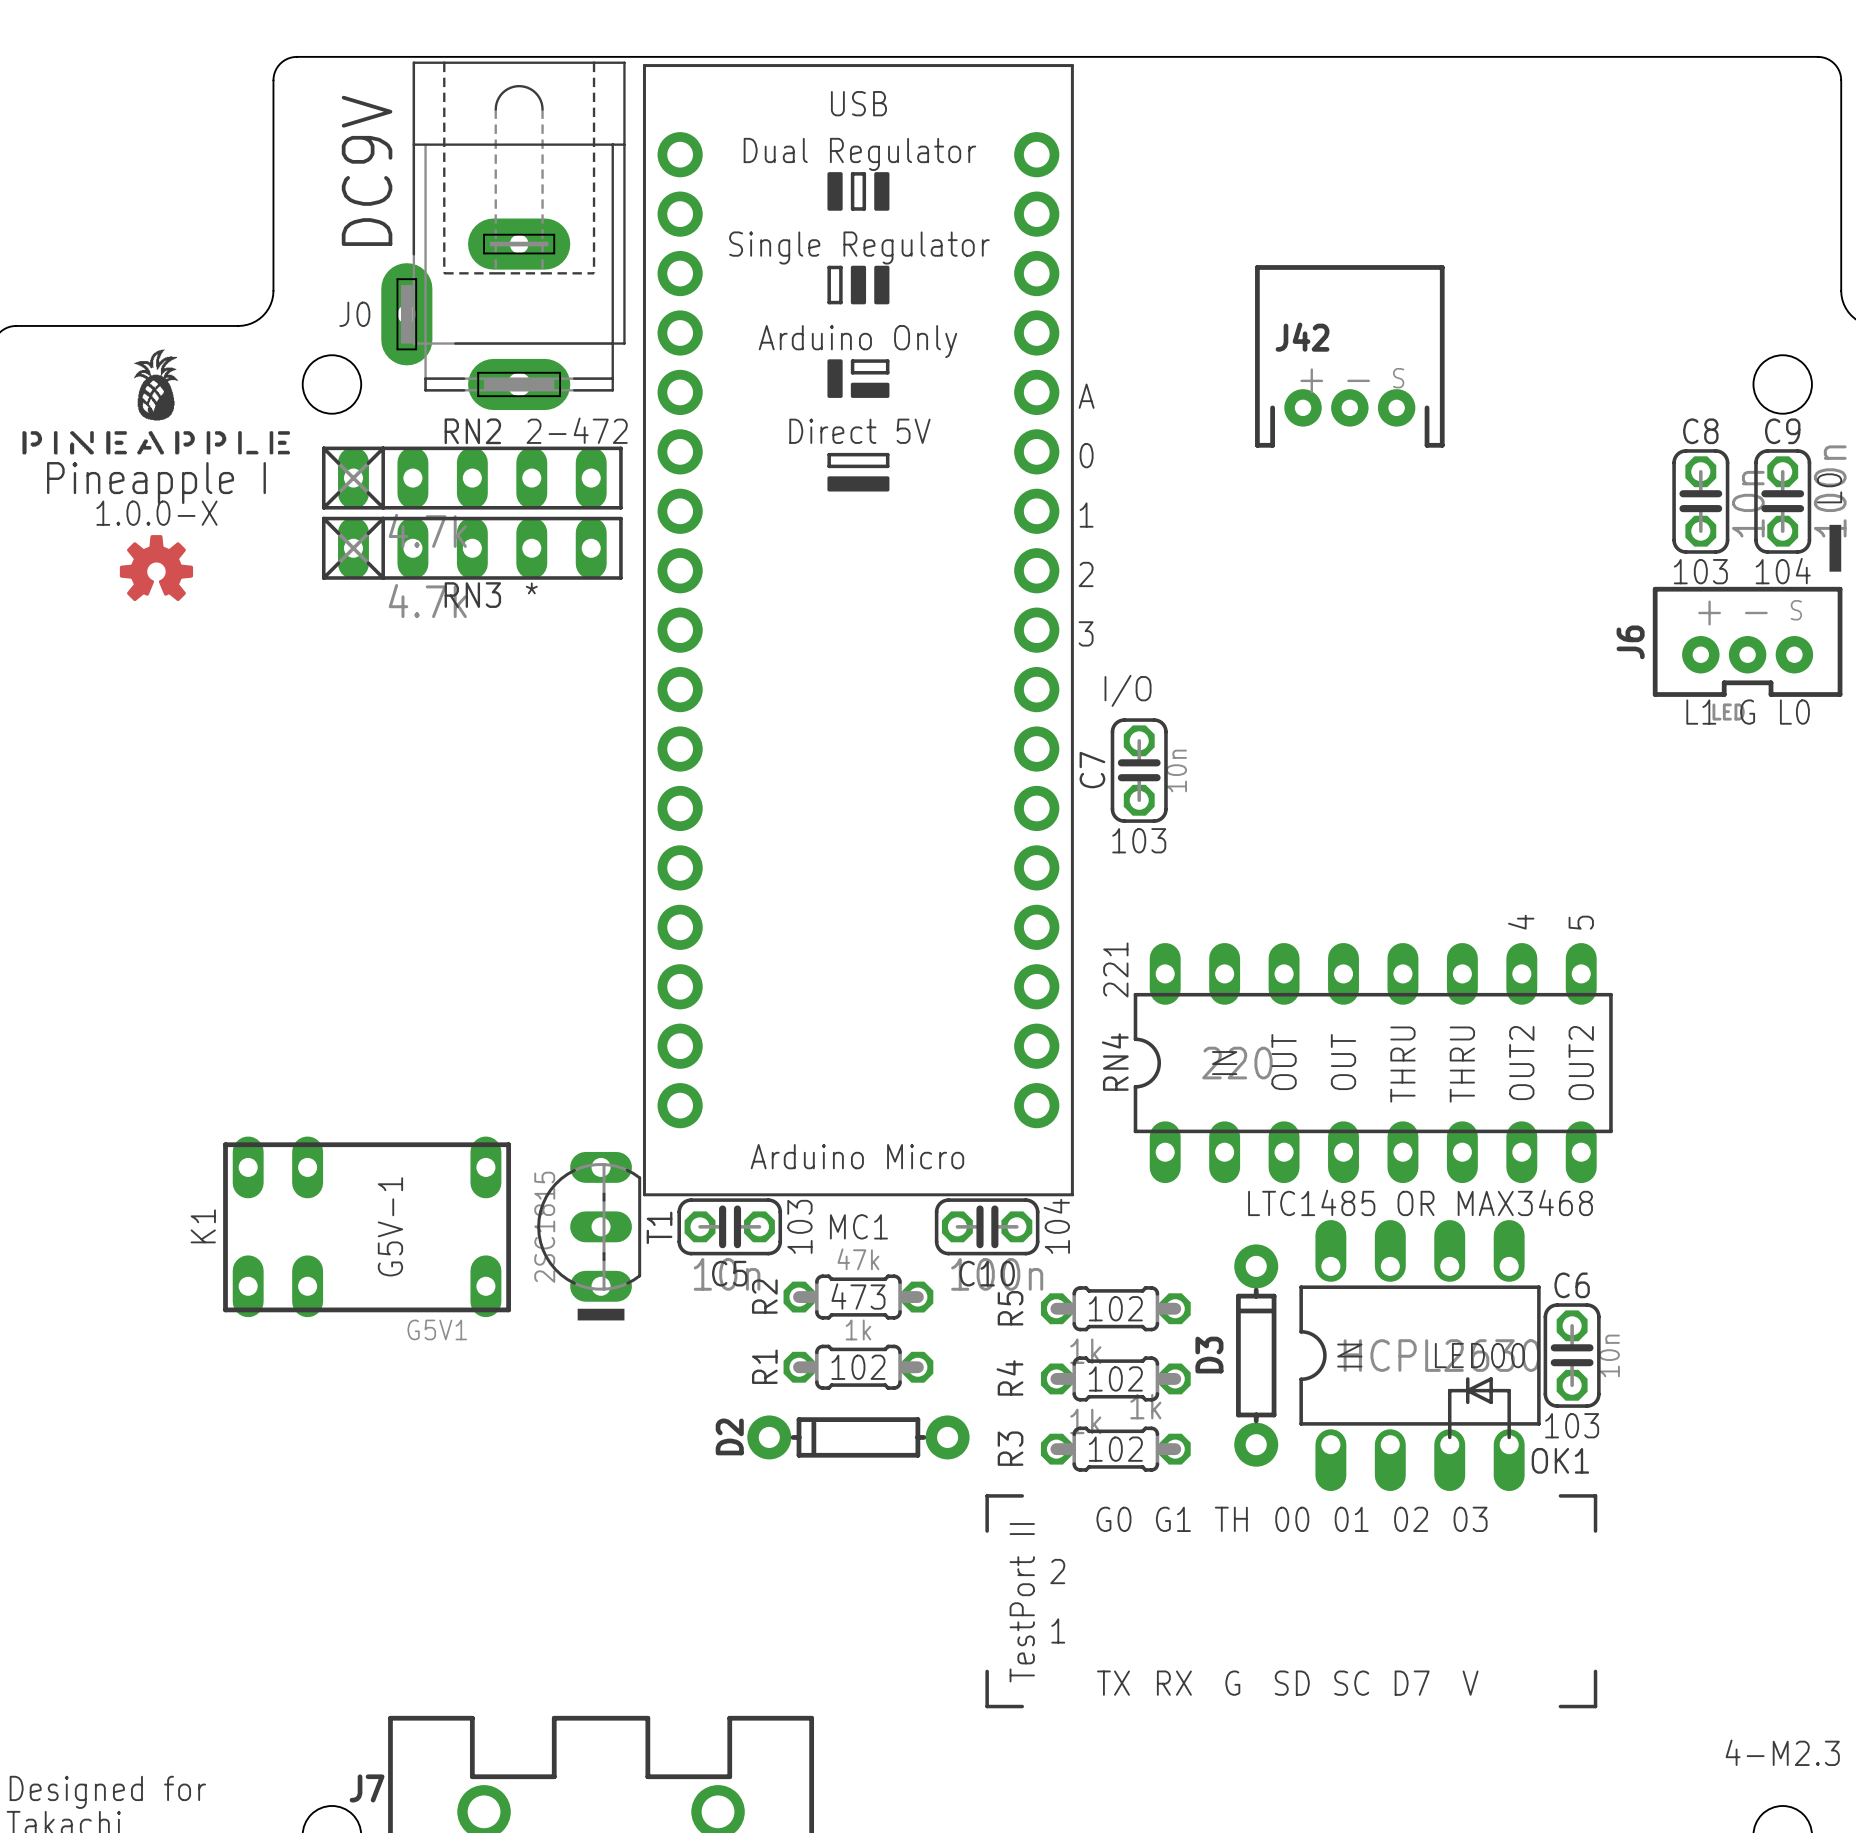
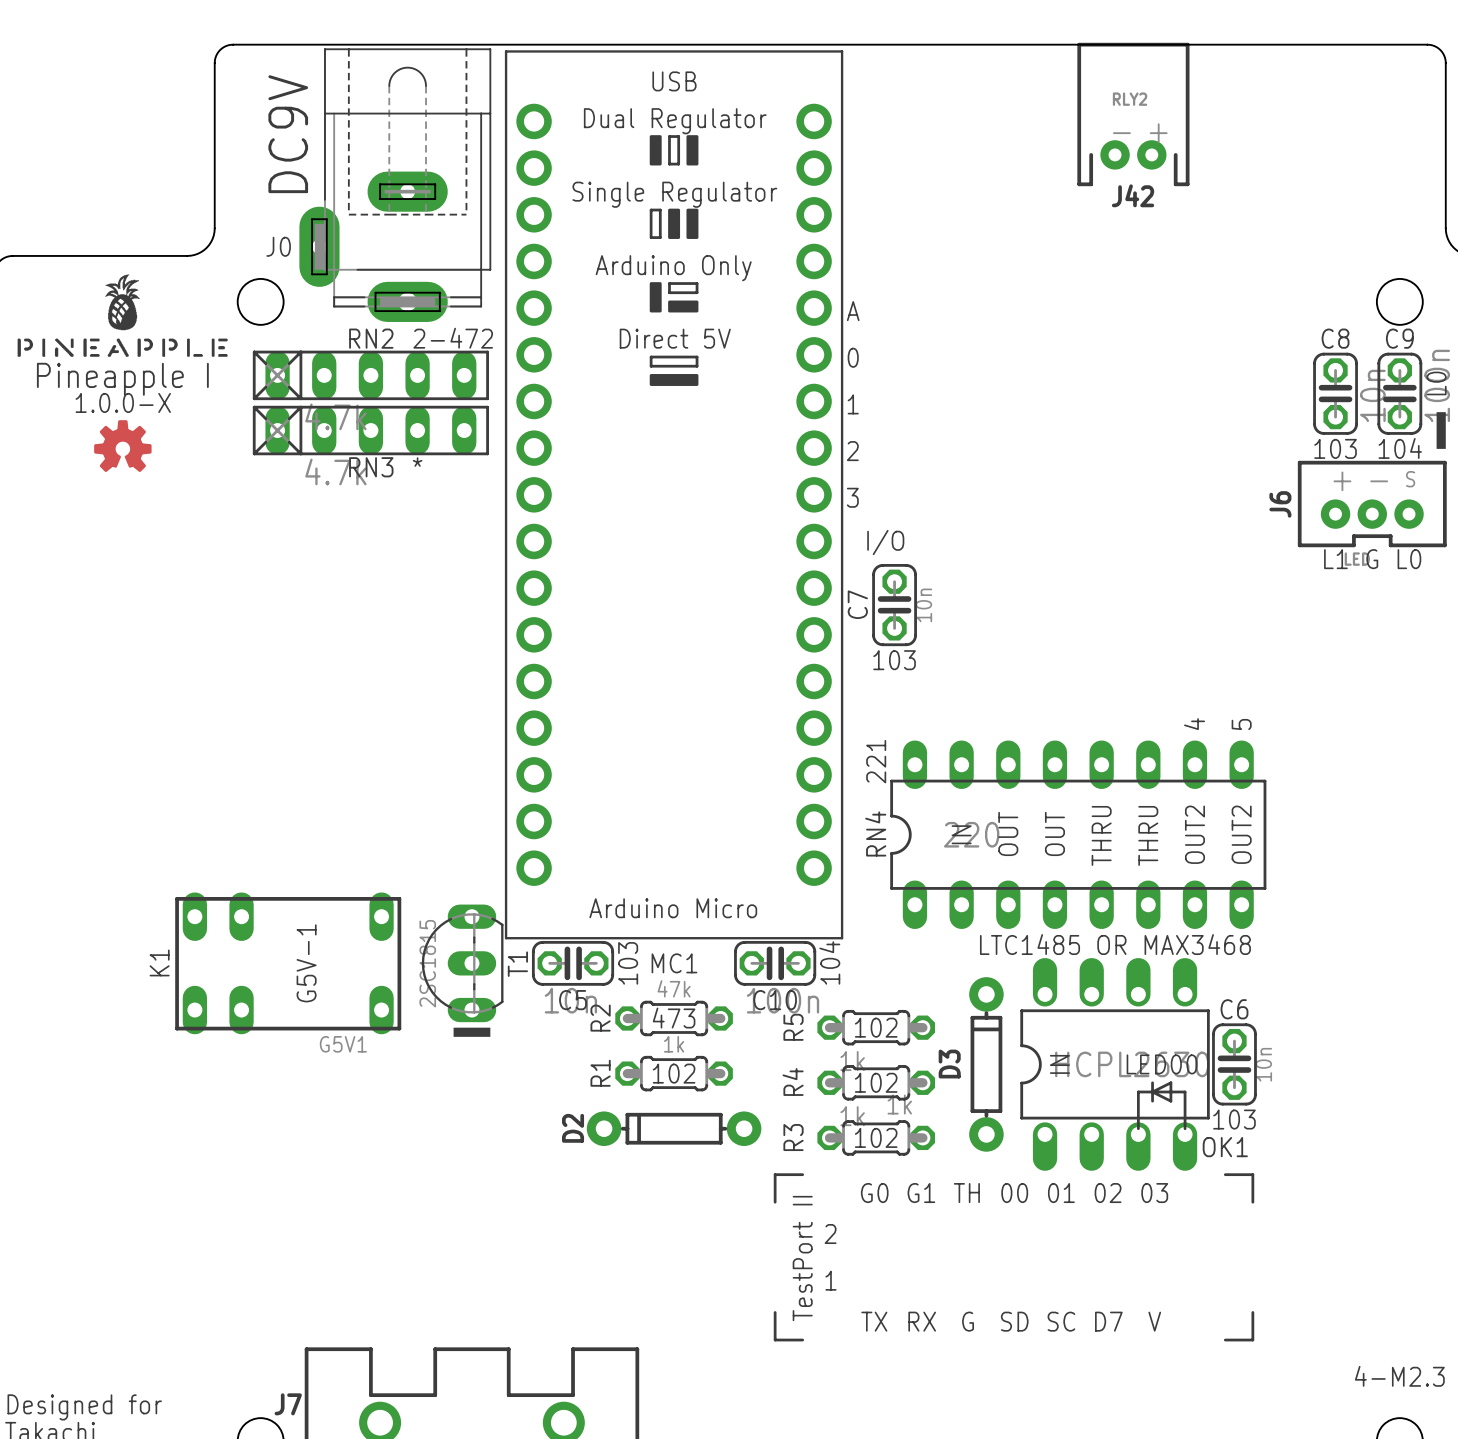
J42 value: none -> RLY2 (1130, 99)
J42 footprint: [1255, 265, 1445, 448] -> [1077, 42, 1190, 187]
J42 name position: J42 (1302, 337) -> J42 (1133, 195)

